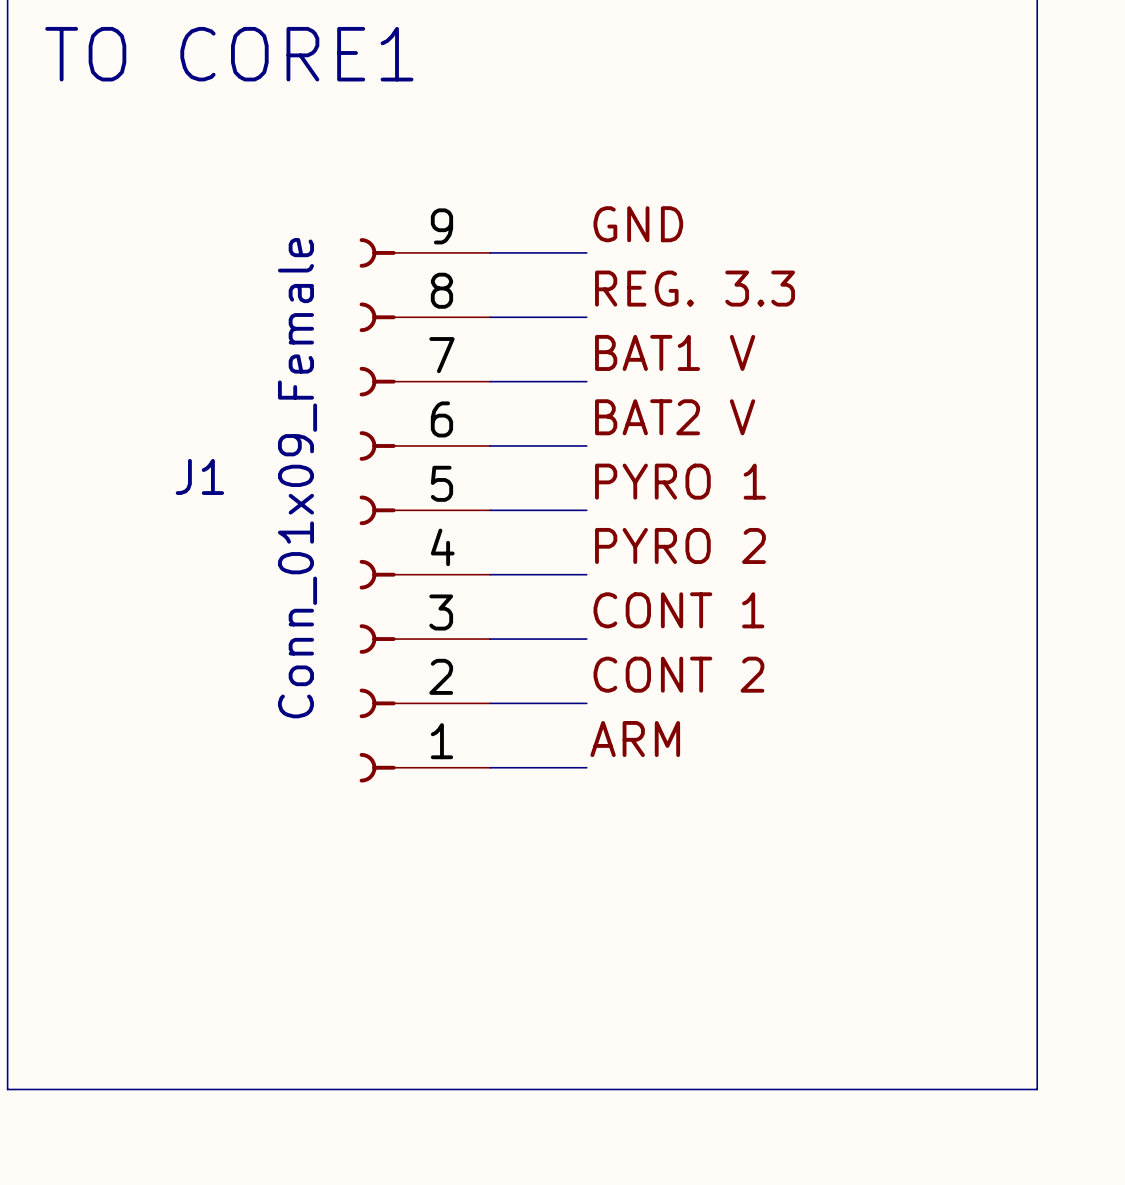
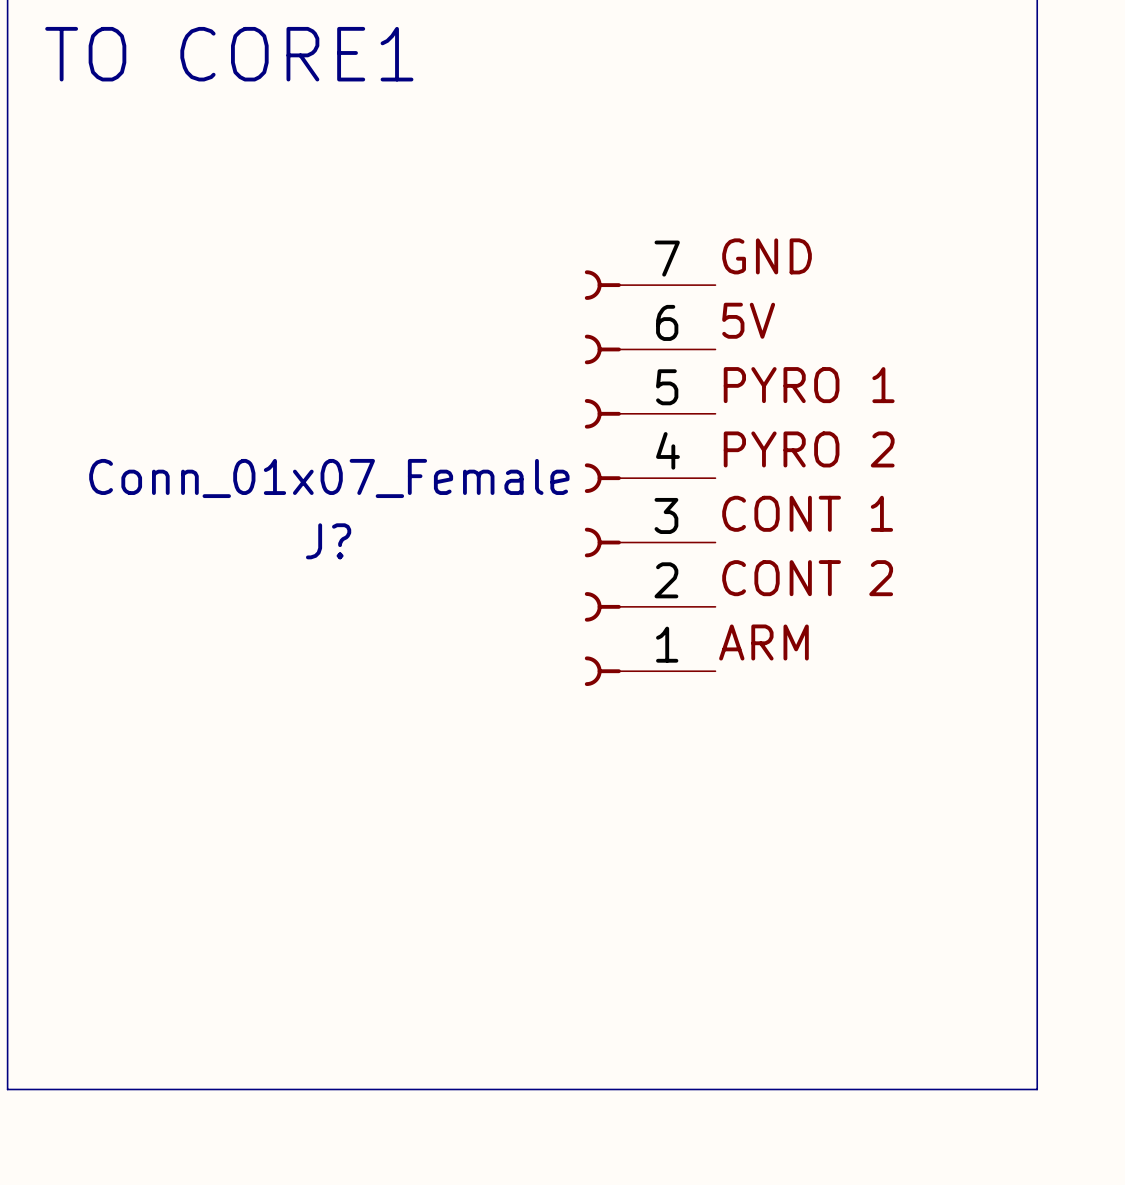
label position: GND (638, 224) -> GND (767, 256)
wire: (490, 252) (586, 252) -> none
label: REG. 3.3 (695, 288) -> none
wire: (490, 317) (586, 317) -> none
label: none -> 5V (748, 320)
label: BAT1 V (675, 352) -> none
wire: (490, 381) (586, 381) -> none
label: BAT2 V (675, 417) -> none
wire: (490, 445) (586, 445) -> none
J?: none -> Conn_01x07_Female (650, 478)
label position: PYRO 1 (680, 481) -> PYRO 1 (809, 385)
J1: Conn_01x09_Female (424, 510) -> none
wire: (490, 510) (586, 510) -> none
label position: PYRO 2 (680, 545) -> PYRO 2 (809, 449)
wire: (490, 574) (586, 574) -> none
label position: CONT 1 (678, 610) -> CONT 1 (807, 513)
wire: (490, 639) (586, 639) -> none
label position: CONT 2 (678, 674) -> CONT 2 (807, 578)
wire: (490, 703) (586, 703) -> none
label position: ARM (635, 739) -> ARM (763, 642)
wire: (490, 767) (586, 767) -> none

